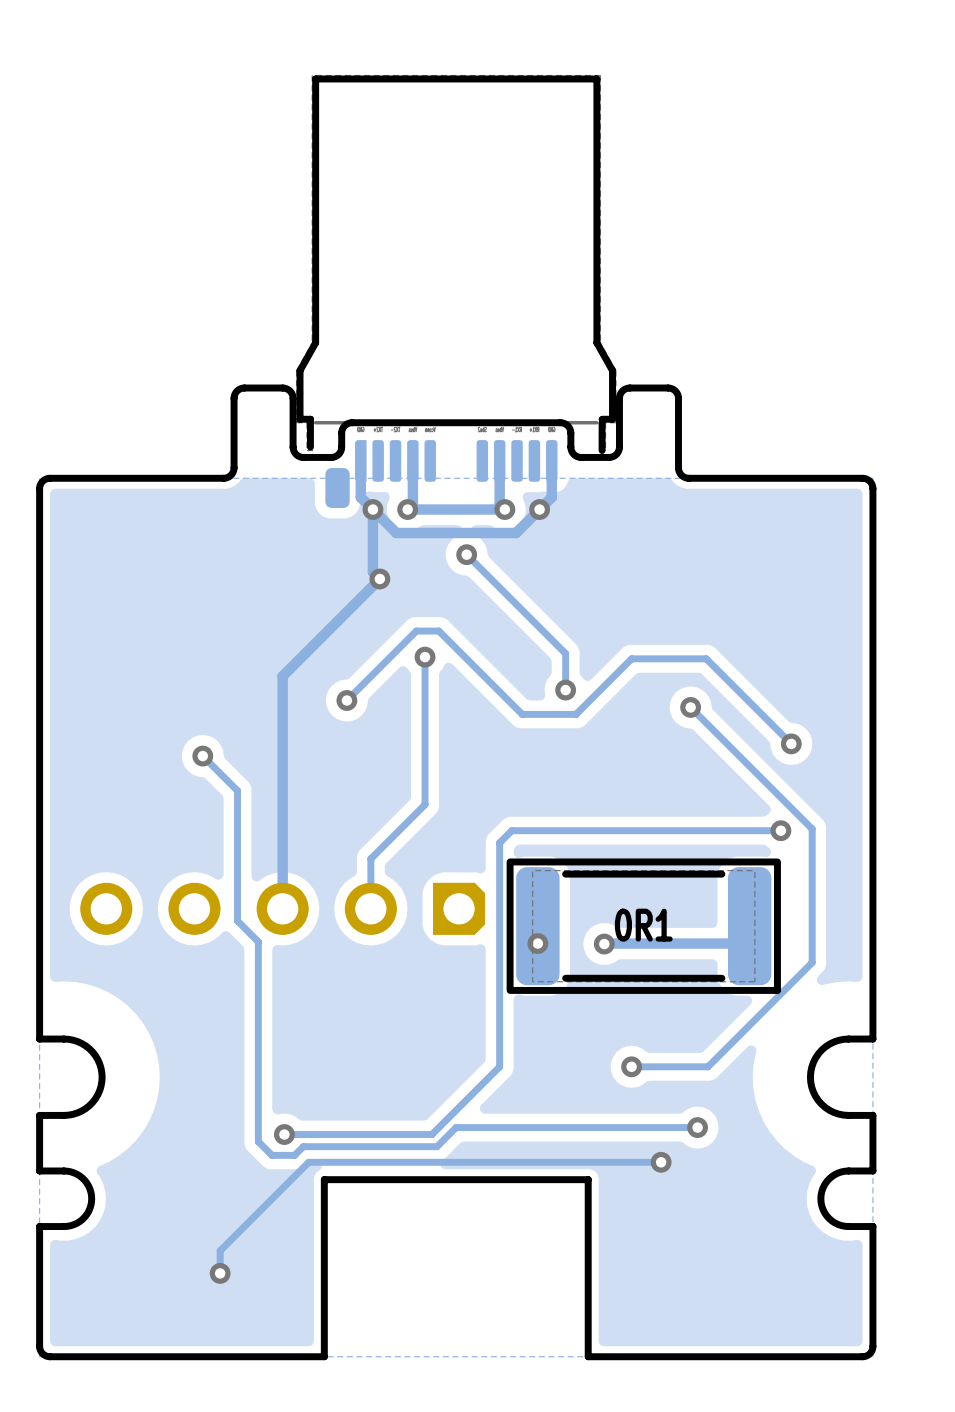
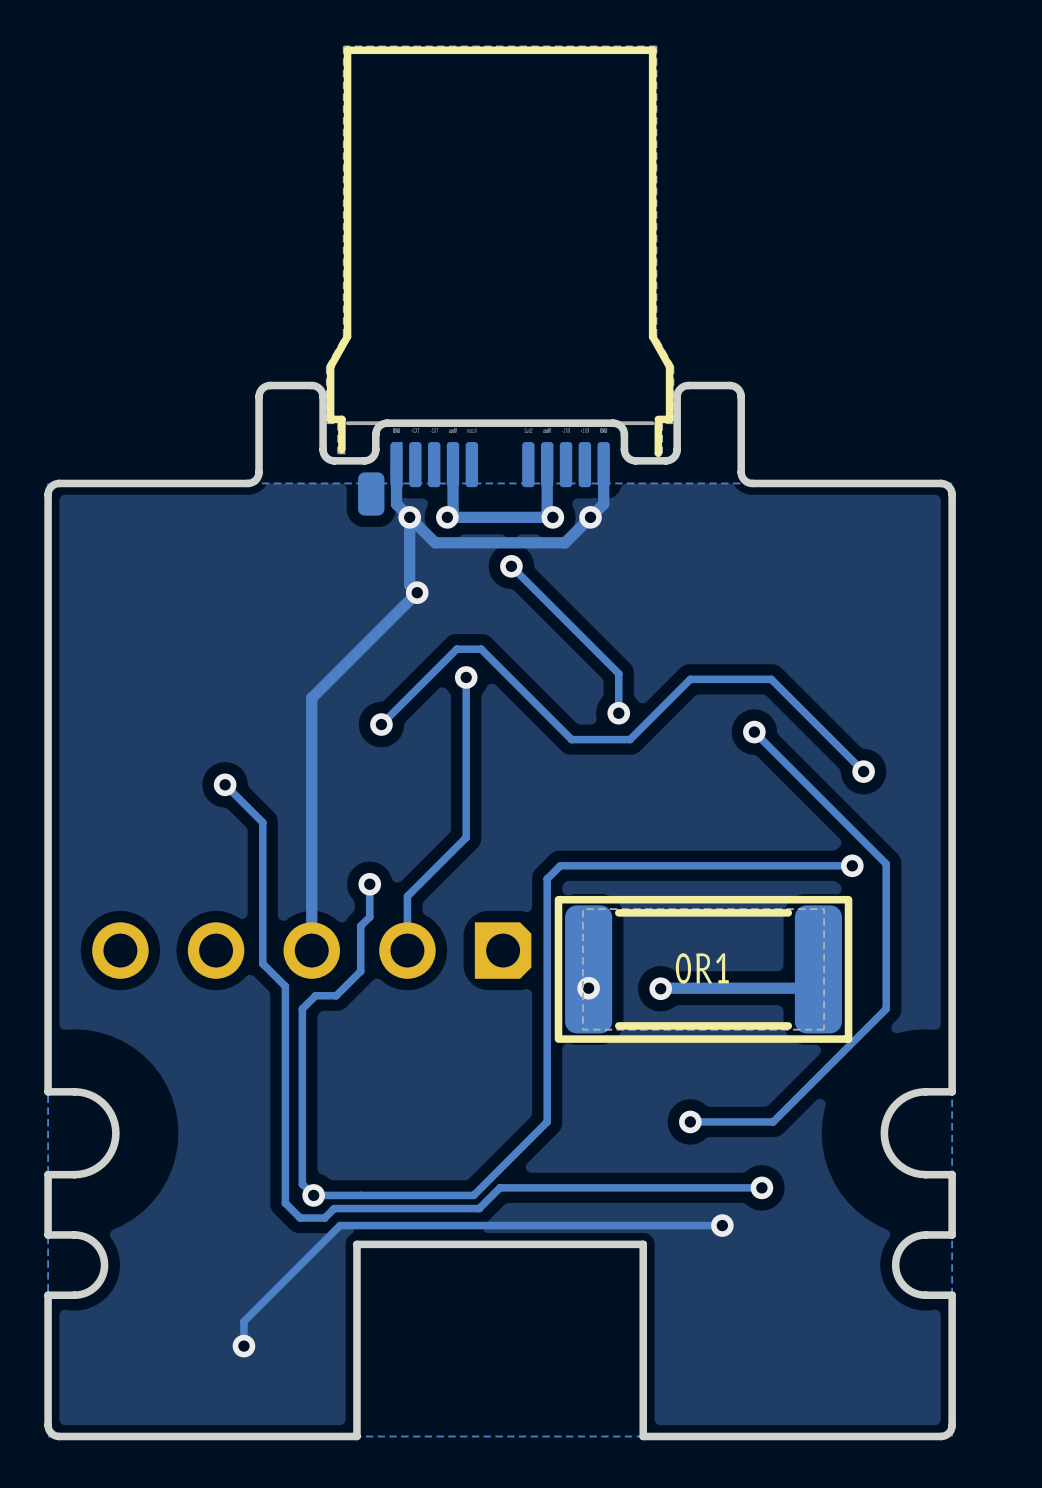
track: none -> (369, 884) (369, 917) (360, 926) (360, 971) (336, 995) (315, 995) (302, 1008) (302, 1184) (313, 1195)
via: none -> (369, 884)

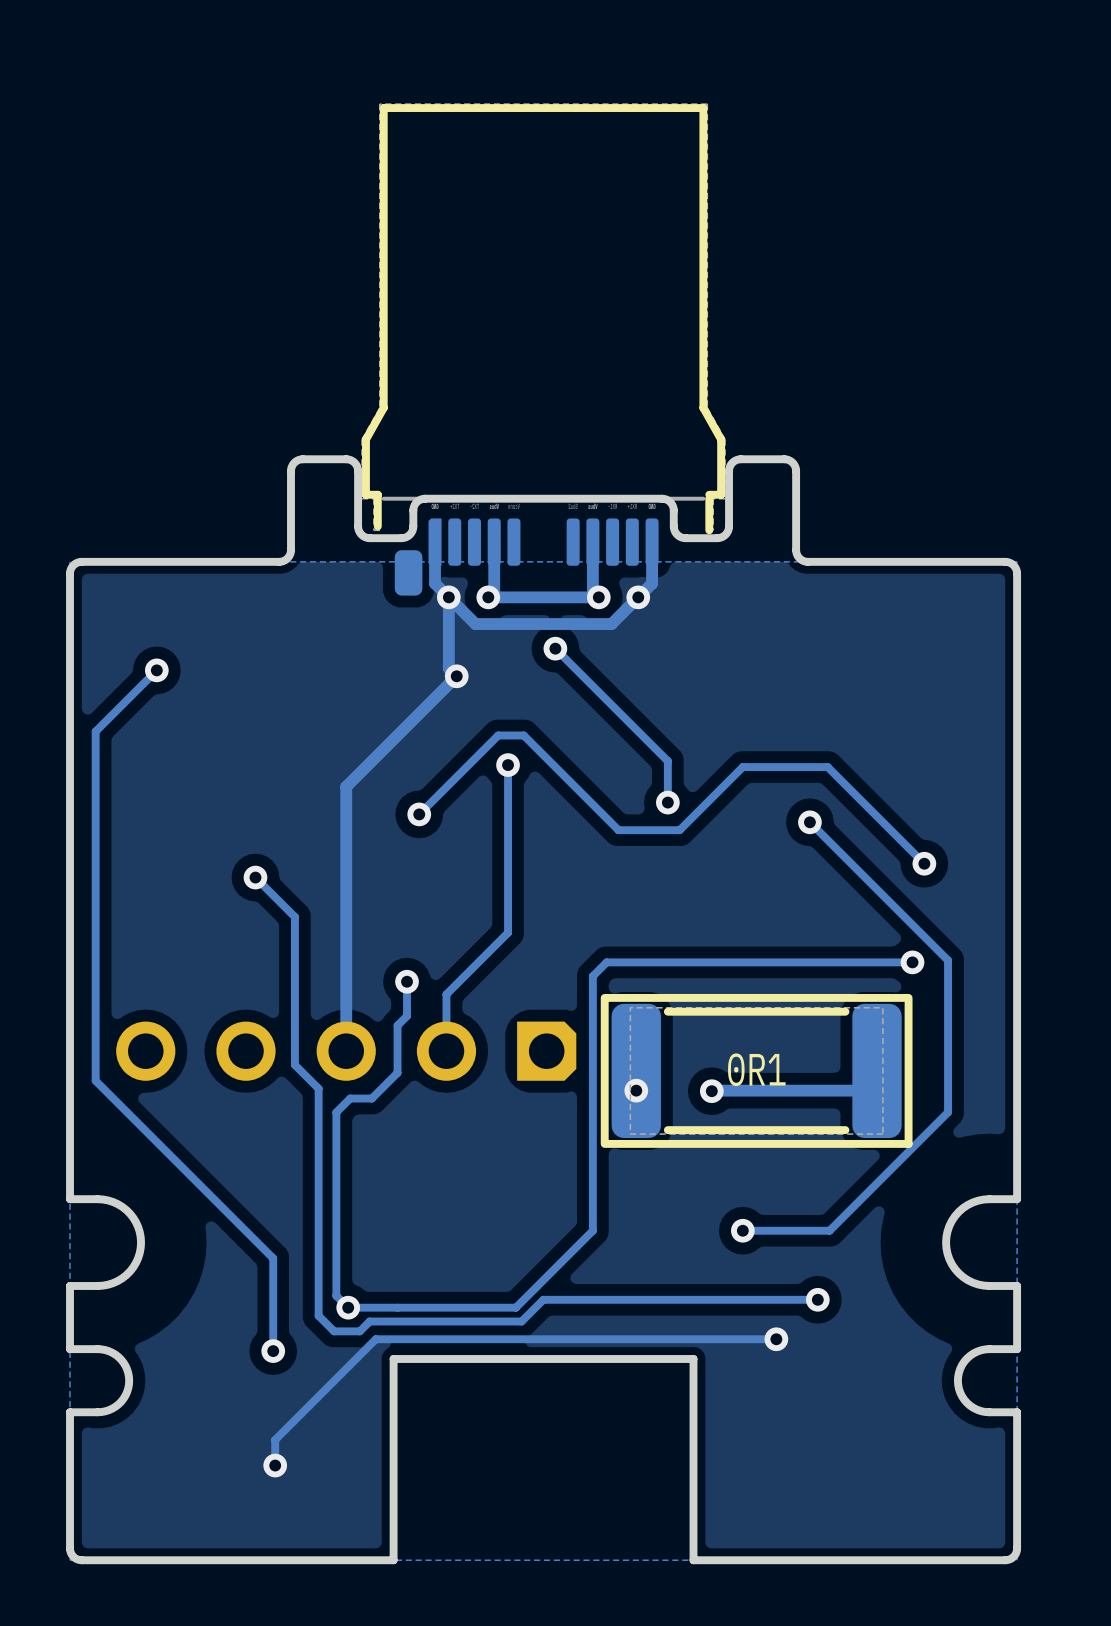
track: none -> (156, 670) (95, 731) (95, 1080) (273, 1258) (273, 1351)
via: none -> (156, 670)
via: none -> (273, 1351)

